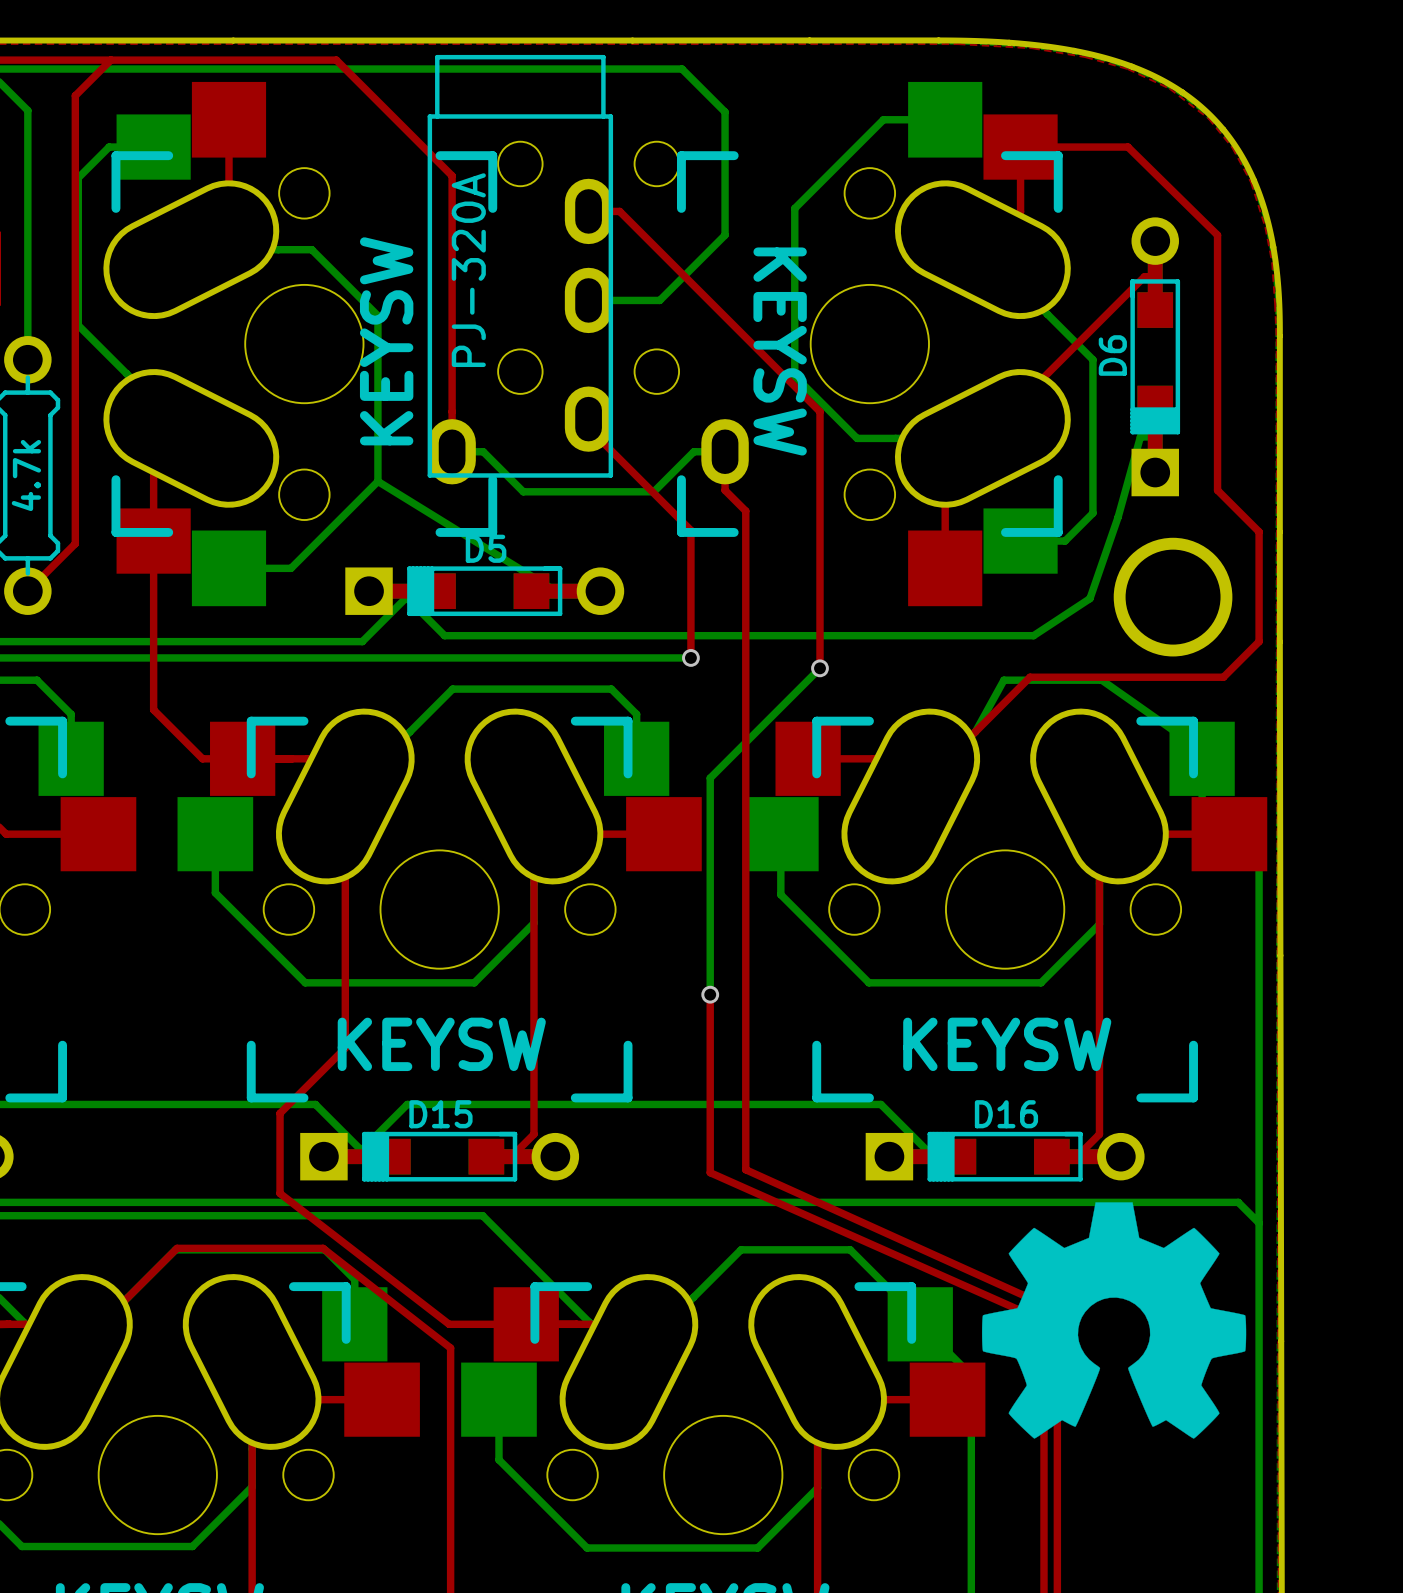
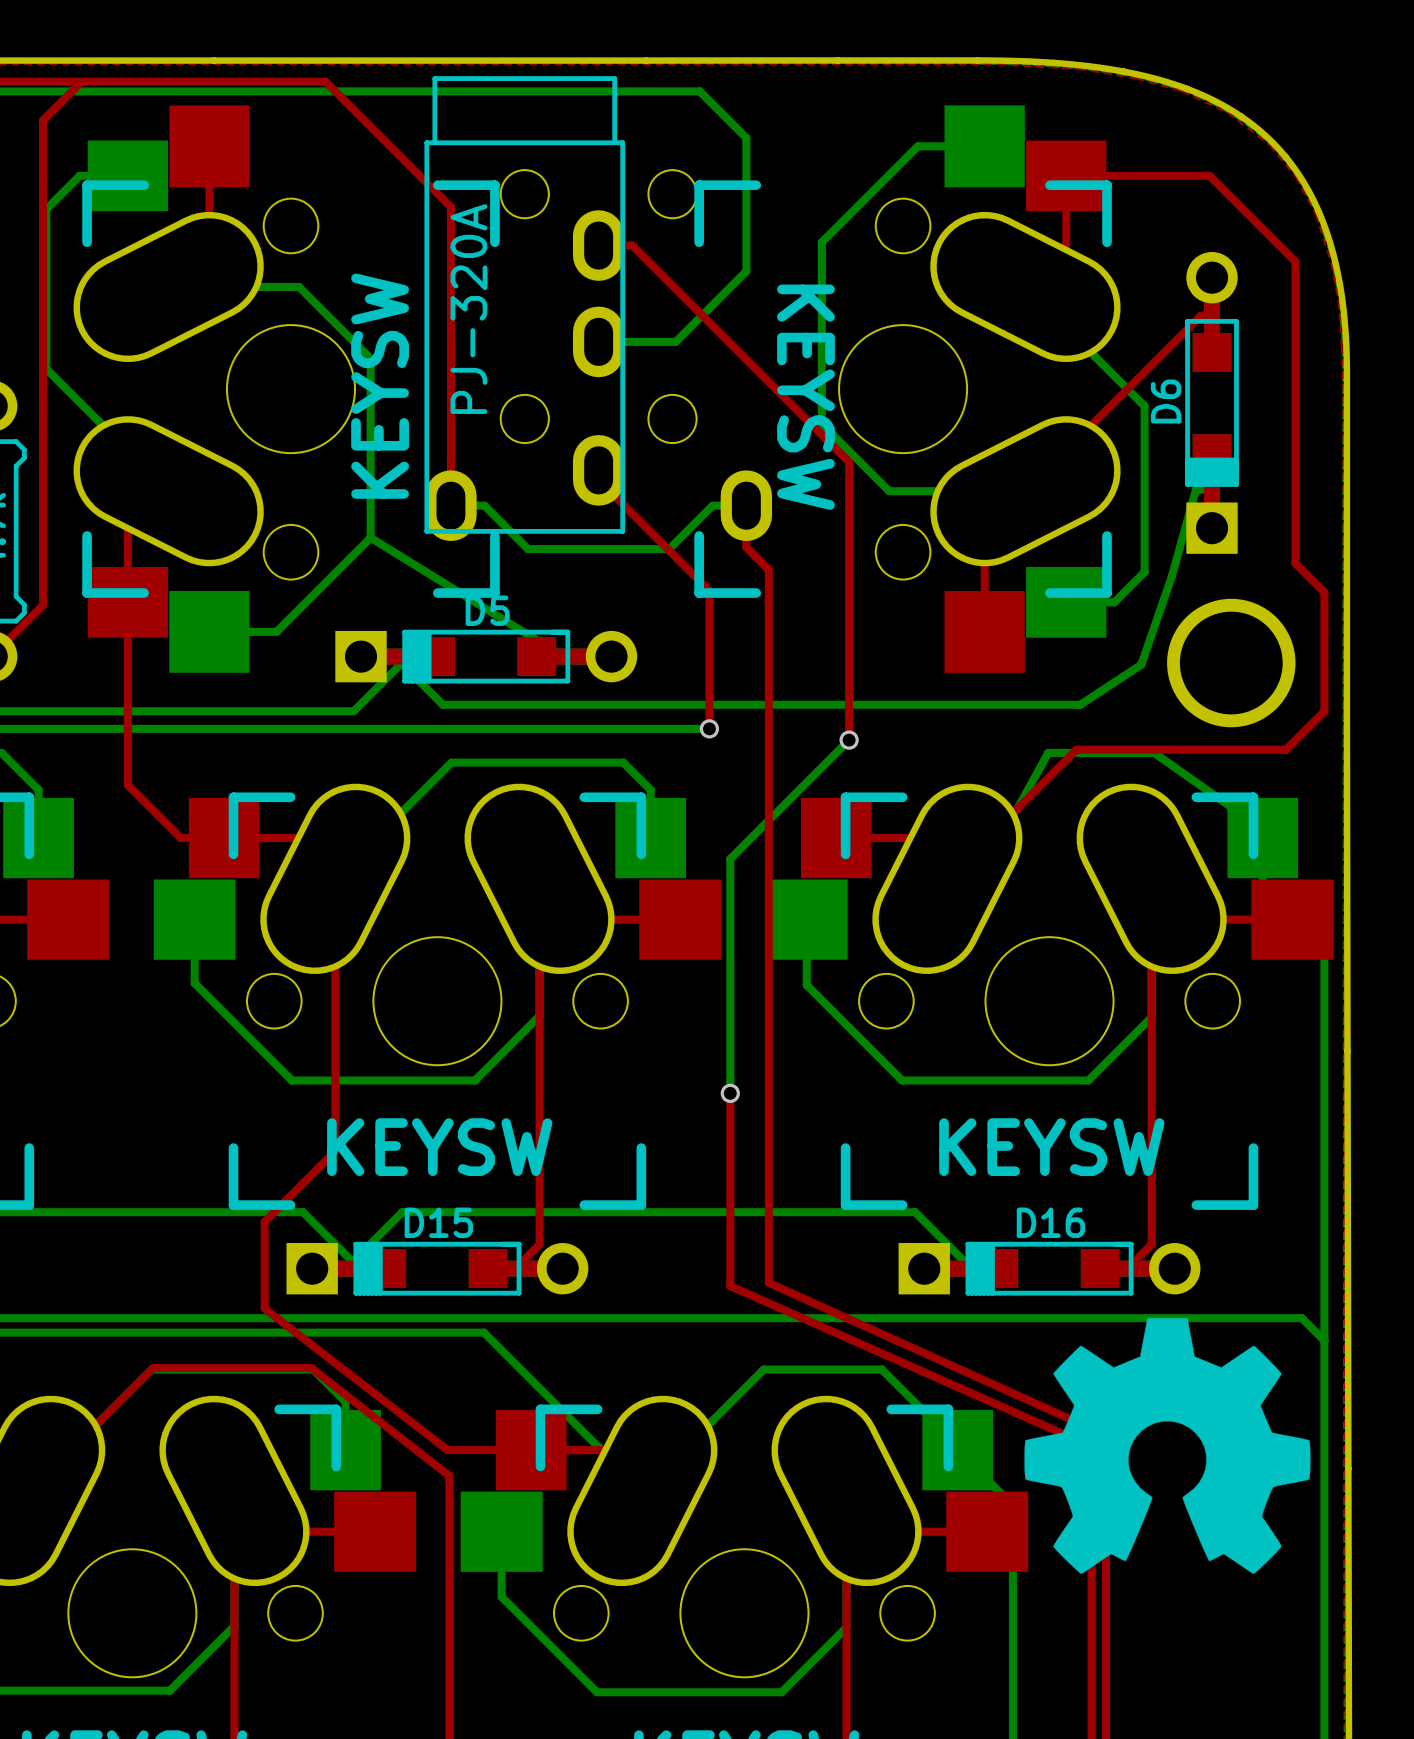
top track: (1127, 147) (1217, 235) (1217, 490) (1232, 505) -> (1182, 175) (1209, 175) (1295, 261) (1295, 563)

